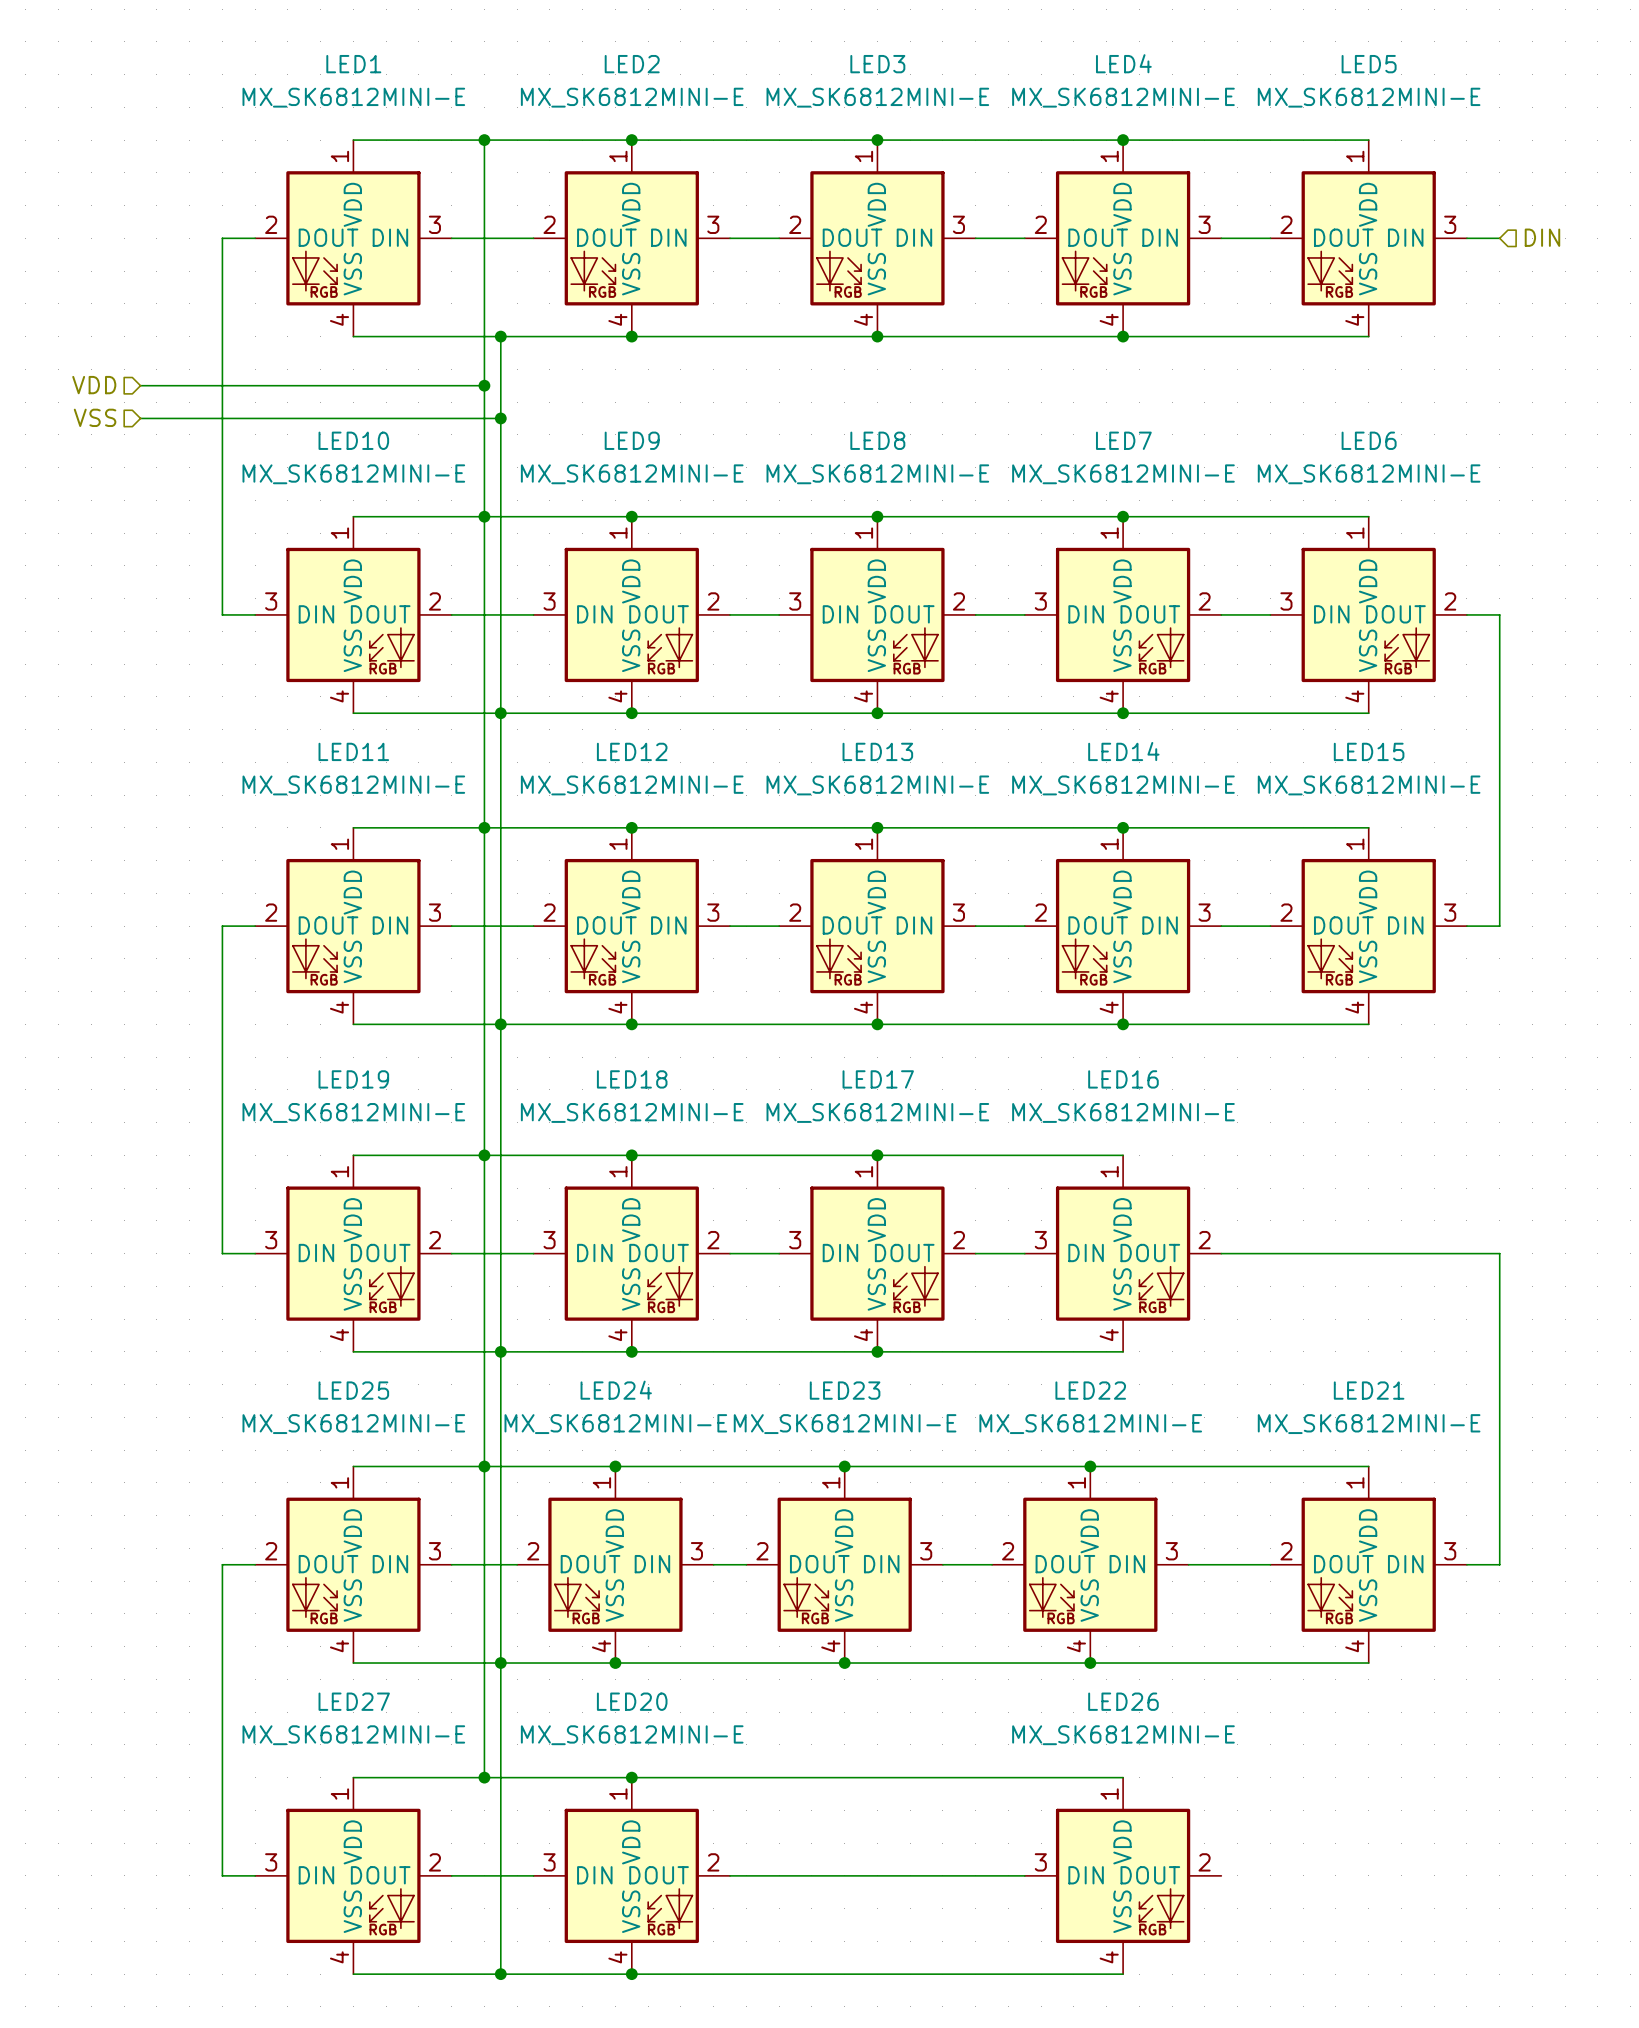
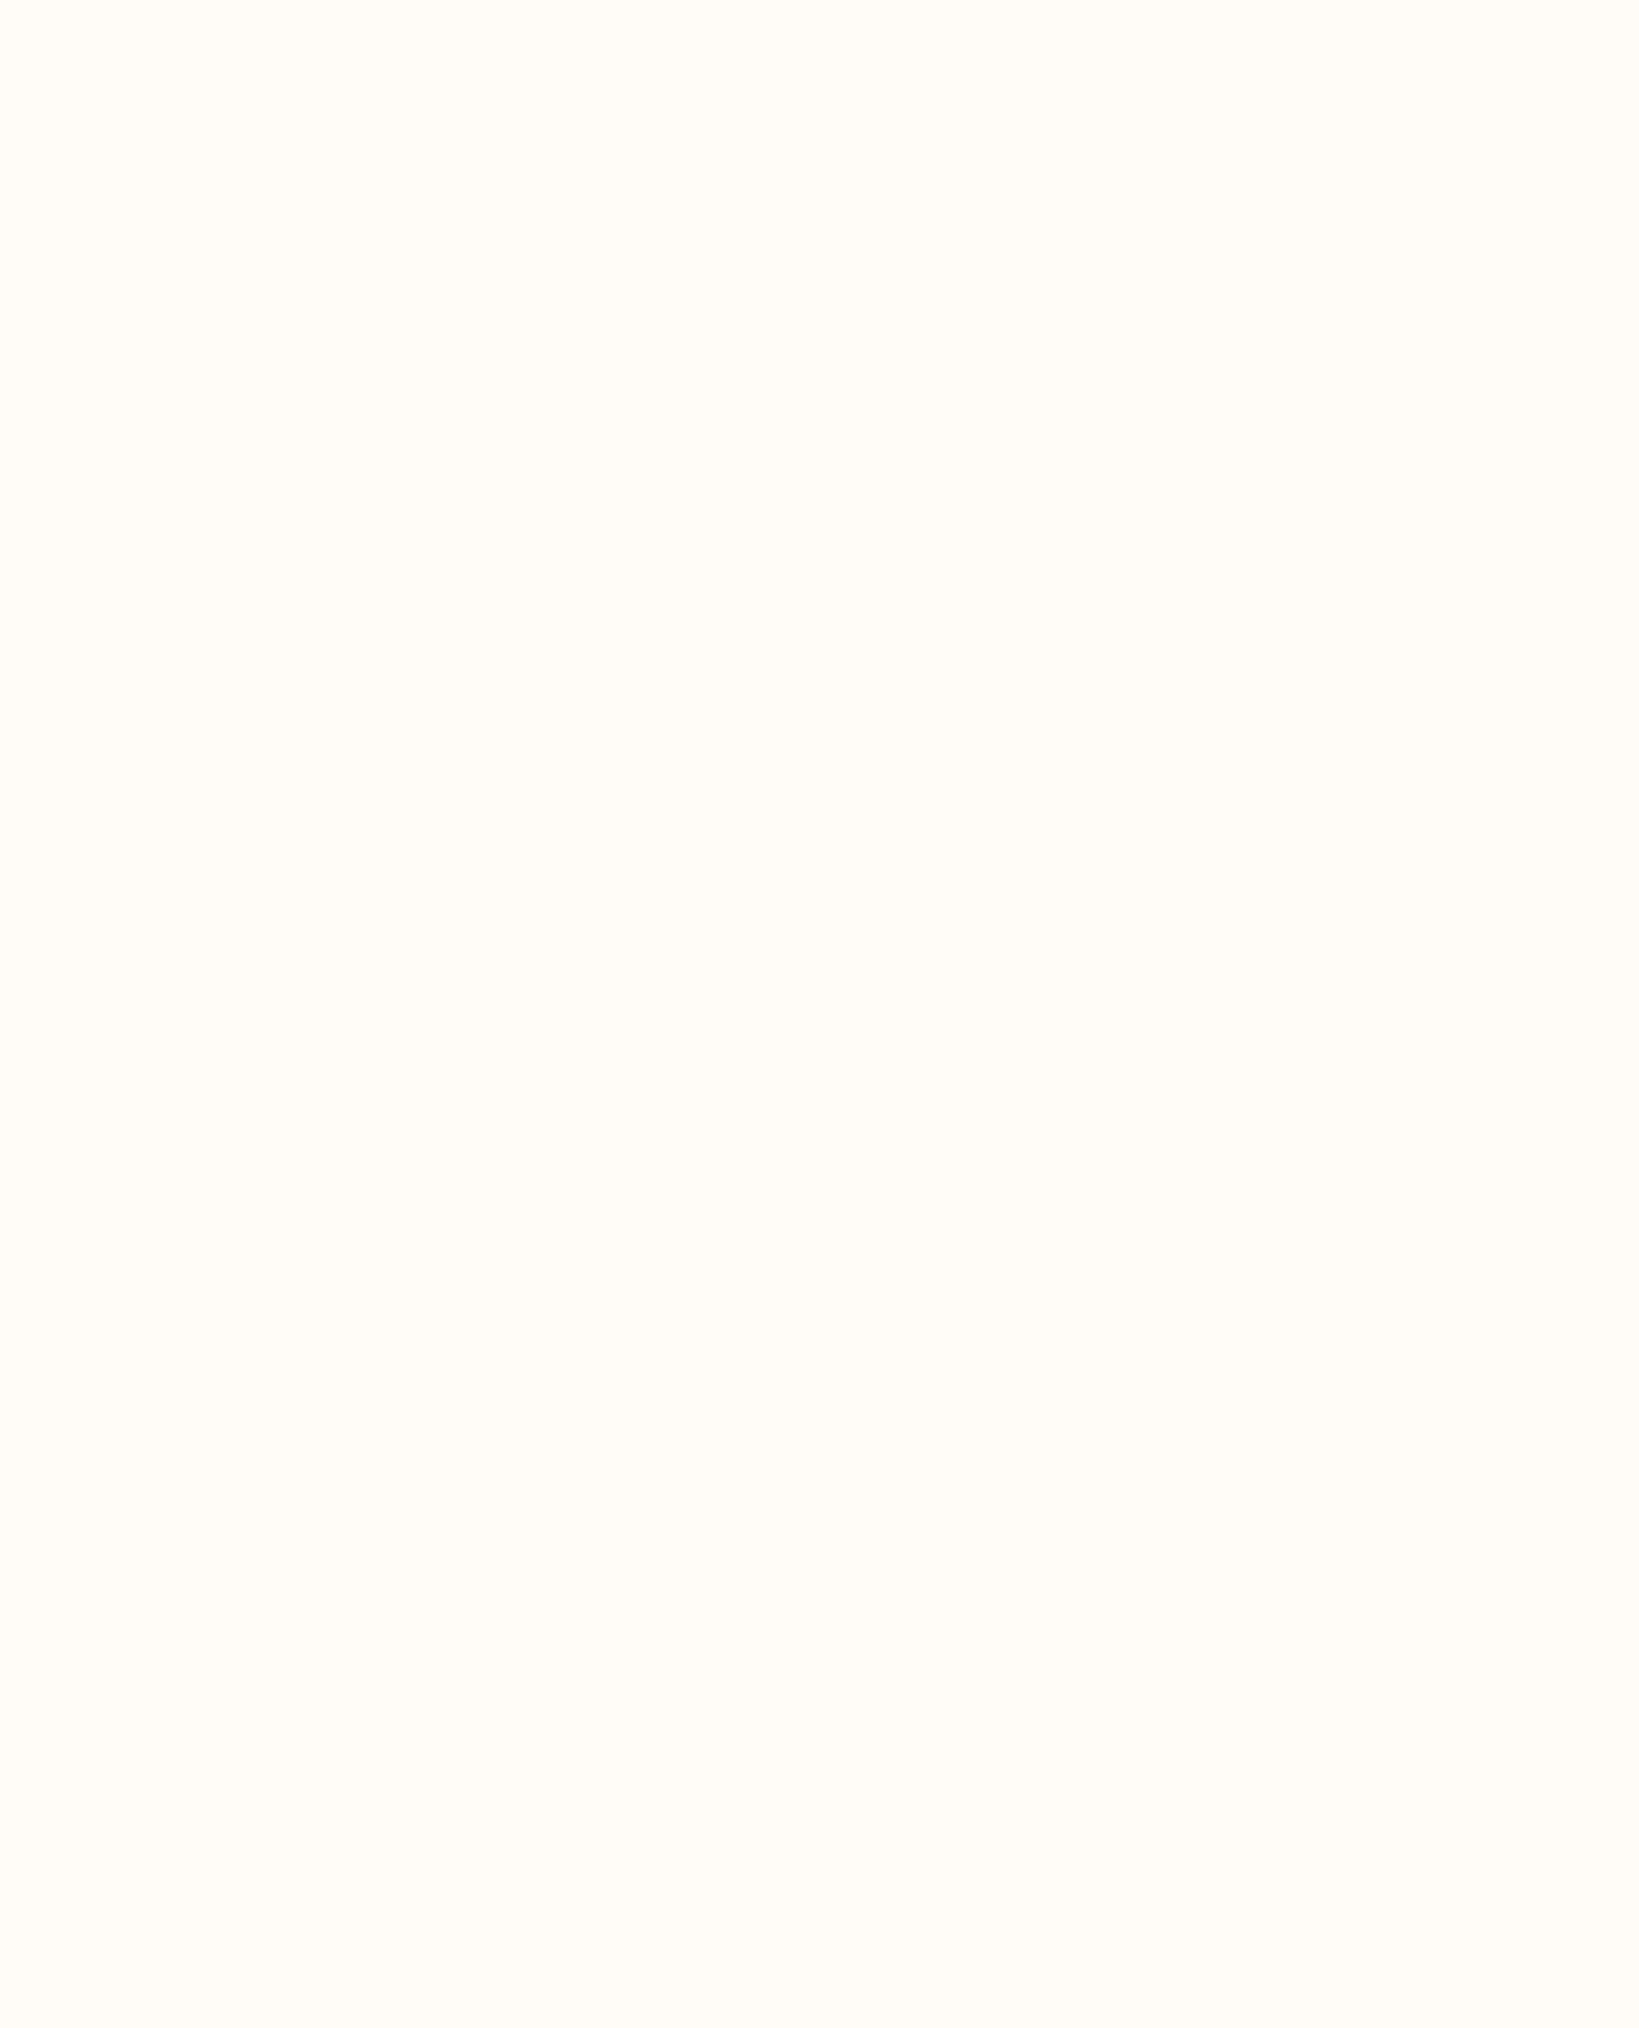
wire: (353, 140) (1368, 140) -> none
wire: (484, 140) (484, 1777) -> none
junction: (484, 140) -> none
junction: (631, 140) -> none
junction: (877, 140) -> none
junction: (1123, 140) -> none
hierarchical label: DIN (1542, 237) -> none
wire: (255, 238) (222, 238) (222, 614) (255, 614) -> none
LED1: MX_SK6812MINI-E (353, 238) -> none
wire: (451, 238) (533, 238) -> none
LED2: MX_SK6812MINI-E (631, 238) -> none
wire: (730, 238) (779, 238) -> none
LED3: MX_SK6812MINI-E (877, 238) -> none
wire: (975, 238) (1024, 238) -> none
LED4: MX_SK6812MINI-E (1123, 238) -> none
wire: (1221, 238) (1270, 238) -> none
LED5: MX_SK6812MINI-E (1368, 238) -> none
wire: (1466, 238) (1499, 238) -> none
wire: (353, 336) (1368, 336) -> none
wire: (500, 336) (500, 1974) -> none
junction: (500, 336) -> none
junction: (631, 336) -> none
junction: (877, 336) -> none
junction: (1123, 336) -> none
hierarchical label: VDD (94, 385) -> none
wire: (140, 385) (484, 385) -> none
junction: (484, 385) -> none
hierarchical label: VSS (95, 417) -> none
wire: (140, 418) (500, 418) -> none
junction: (500, 418) -> none
wire: (353, 516) (1368, 516) -> none
junction: (484, 516) -> none
junction: (631, 516) -> none
junction: (877, 516) -> none
junction: (1123, 516) -> none
LED10: MX_SK6812MINI-E (353, 614) -> none
wire: (451, 614) (533, 614) -> none
LED9: MX_SK6812MINI-E (631, 614) -> none
wire: (730, 614) (779, 614) -> none
LED8: MX_SK6812MINI-E (877, 614) -> none
wire: (975, 614) (1024, 614) -> none
LED7: MX_SK6812MINI-E (1123, 614) -> none
wire: (1221, 614) (1270, 614) -> none
LED6: MX_SK6812MINI-E (1368, 614) -> none
wire: (1466, 614) (1499, 614) (1499, 926) (1466, 926) -> none
wire: (353, 713) (1368, 713) -> none
junction: (500, 713) -> none
junction: (631, 713) -> none
junction: (877, 713) -> none
junction: (1123, 713) -> none
wire: (353, 827) (1368, 827) -> none
junction: (484, 827) -> none
junction: (631, 827) -> none
junction: (877, 827) -> none
junction: (1123, 827) -> none
wire: (255, 926) (222, 926) (222, 1253) (255, 1253) -> none
LED11: MX_SK6812MINI-E (353, 926) -> none
wire: (451, 926) (533, 926) -> none
LED12: MX_SK6812MINI-E (631, 926) -> none
wire: (730, 926) (779, 926) -> none
LED13: MX_SK6812MINI-E (877, 926) -> none
wire: (975, 926) (1024, 926) -> none
LED14: MX_SK6812MINI-E (1123, 926) -> none
wire: (1221, 926) (1270, 926) -> none
LED15: MX_SK6812MINI-E (1368, 926) -> none
wire: (353, 1024) (1368, 1024) -> none
junction: (500, 1024) -> none
junction: (631, 1024) -> none
junction: (877, 1024) -> none
junction: (1123, 1024) -> none
wire: (353, 1155) (1123, 1155) -> none
junction: (484, 1155) -> none
junction: (631, 1155) -> none
junction: (877, 1155) -> none
LED19: MX_SK6812MINI-E (353, 1253) -> none
wire: (451, 1253) (533, 1253) -> none
LED18: MX_SK6812MINI-E (631, 1253) -> none
wire: (730, 1253) (779, 1253) -> none
LED17: MX_SK6812MINI-E (877, 1253) -> none
wire: (975, 1253) (1024, 1253) -> none
LED16: MX_SK6812MINI-E (1123, 1253) -> none
wire: (1221, 1253) (1499, 1253) (1499, 1564) (1466, 1564) -> none
wire: (353, 1351) (1123, 1351) -> none
junction: (500, 1351) -> none
junction: (631, 1351) -> none
junction: (877, 1351) -> none
wire: (353, 1466) (1368, 1466) -> none
junction: (484, 1466) -> none
junction: (615, 1466) -> none
junction: (844, 1466) -> none
junction: (1090, 1466) -> none
wire: (255, 1564) (222, 1564) (222, 1875) (255, 1875) -> none
LED25: MX_SK6812MINI-E (353, 1564) -> none
wire: (451, 1564) (517, 1564) -> none
LED24: MX_SK6812MINI-E (615, 1564) -> none
wire: (713, 1564) (746, 1564) -> none
LED23: MX_SK6812MINI-E (844, 1564) -> none
wire: (942, 1564) (992, 1564) -> none
LED22: MX_SK6812MINI-E (1090, 1564) -> none
wire: (1188, 1564) (1270, 1564) -> none
LED21: MX_SK6812MINI-E (1368, 1564) -> none
wire: (353, 1663) (1368, 1663) -> none
junction: (500, 1663) -> none
junction: (615, 1663) -> none
junction: (844, 1663) -> none
junction: (1090, 1663) -> none
wire: (353, 1777) (1123, 1777) -> none
junction: (484, 1777) -> none
junction: (631, 1777) -> none
LED27: MX_SK6812MINI-E (353, 1875) -> none
wire: (451, 1875) (533, 1875) -> none
LED20: MX_SK6812MINI-E (631, 1875) -> none
wire: (730, 1875) (1024, 1875) -> none
LED26: MX_SK6812MINI-E (1123, 1875) -> none
wire: (353, 1974) (1123, 1974) -> none
junction: (500, 1974) -> none
junction: (631, 1974) -> none

